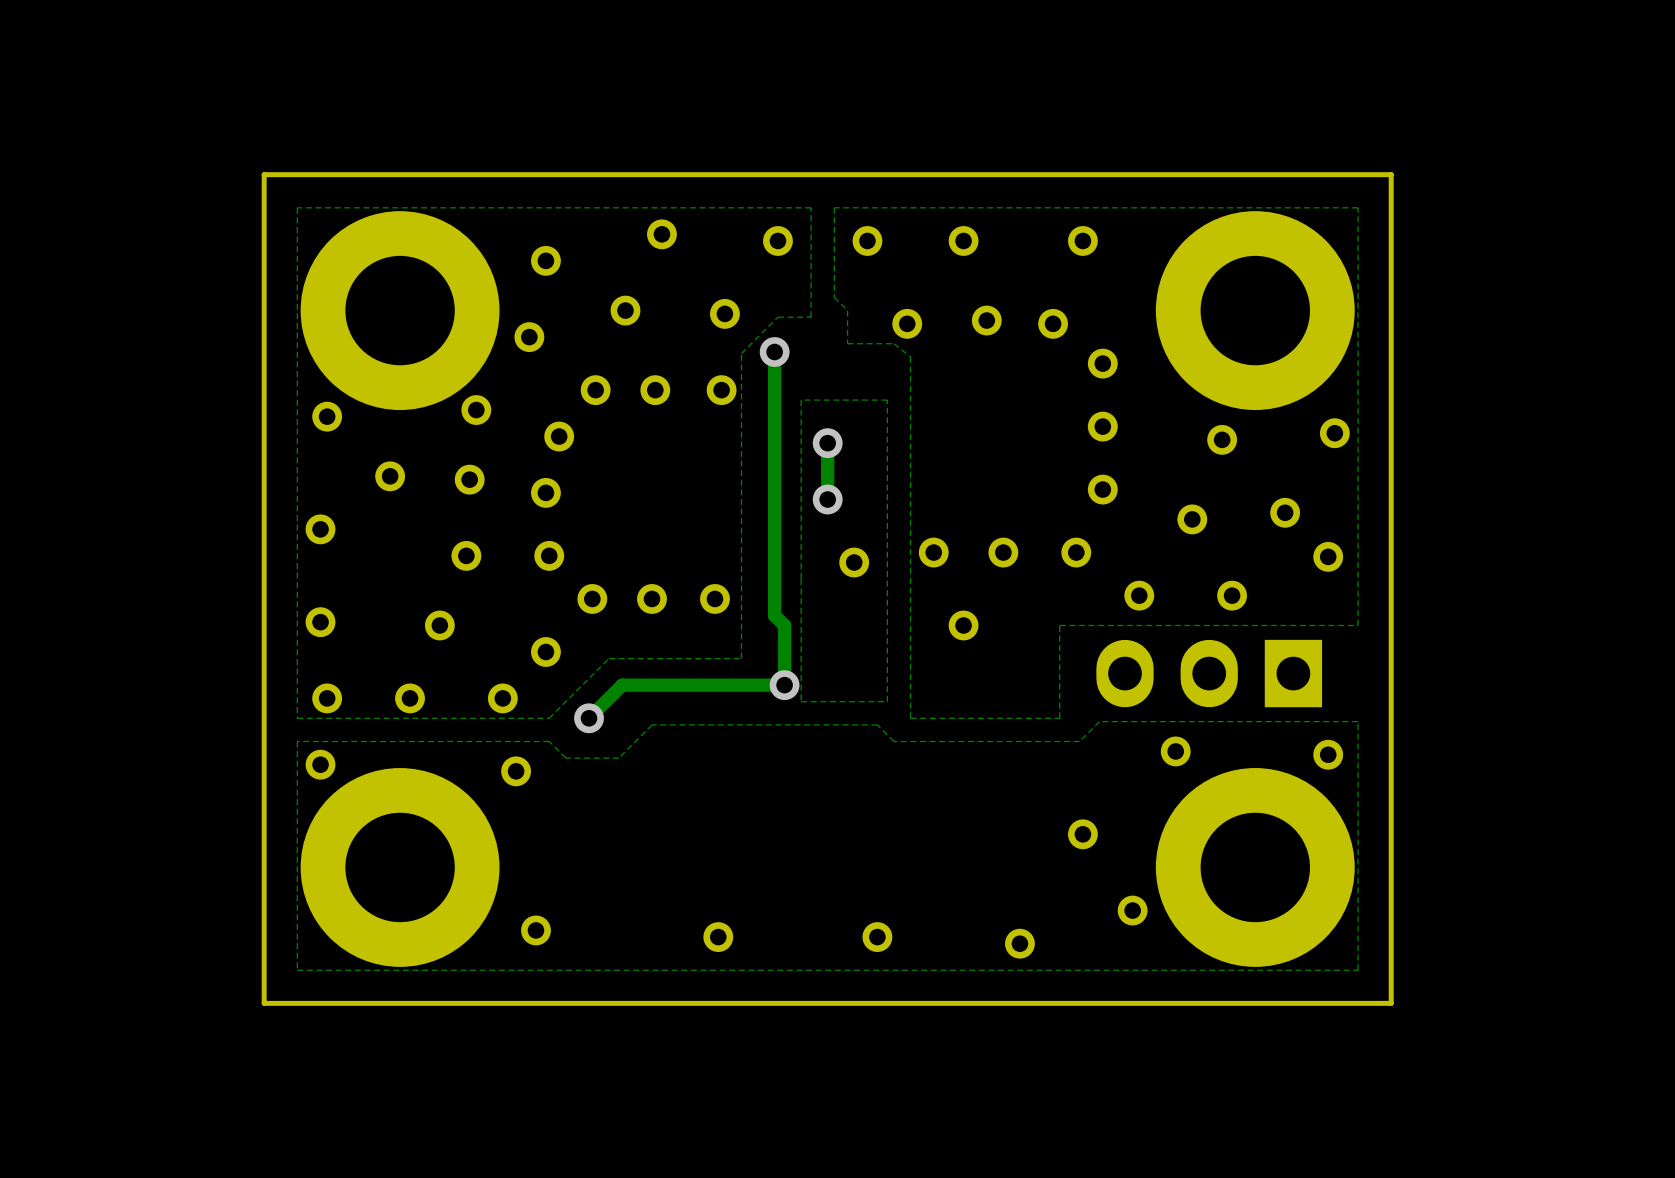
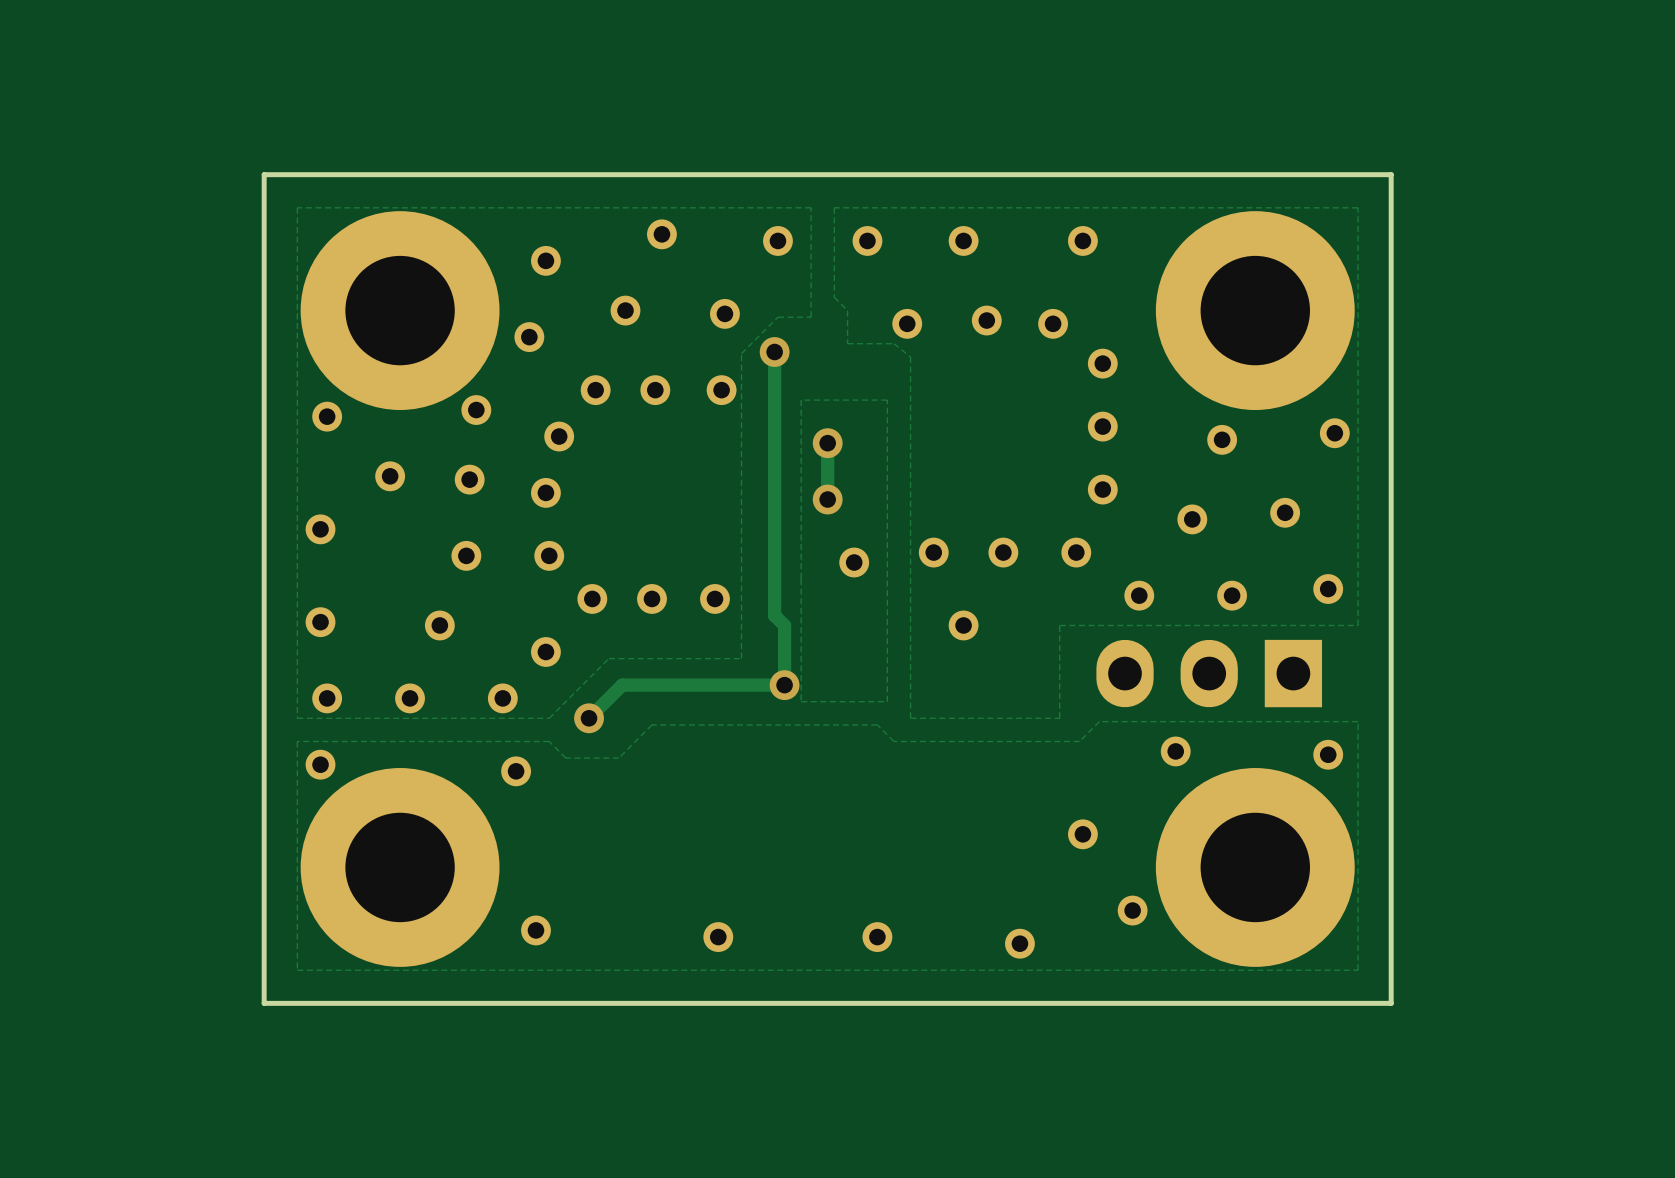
part position: (1328, 556) -> (1328, 589)

